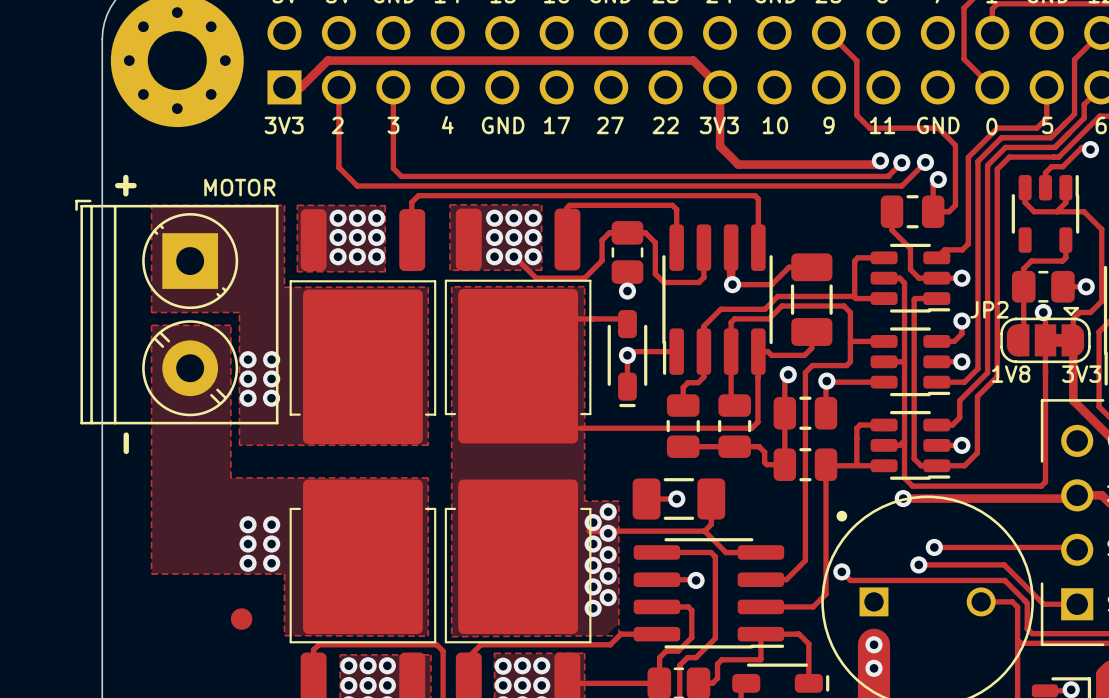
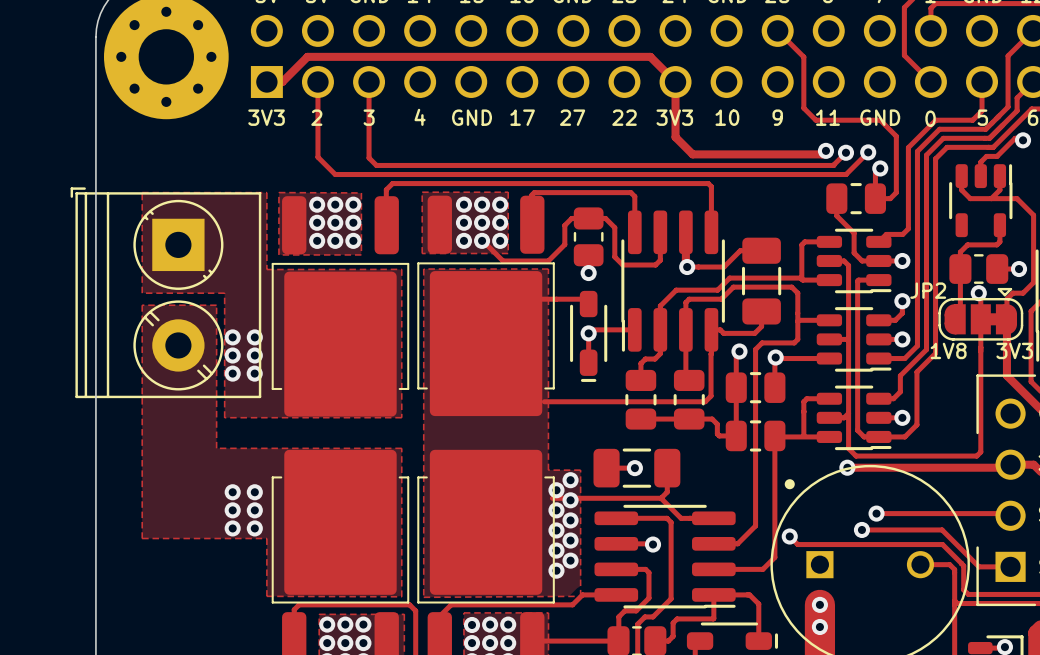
text: + (125, 185) -> none
text: MOTOR (239, 187) -> none
text: - (126, 443) -> none
part: (241, 619) -> none

